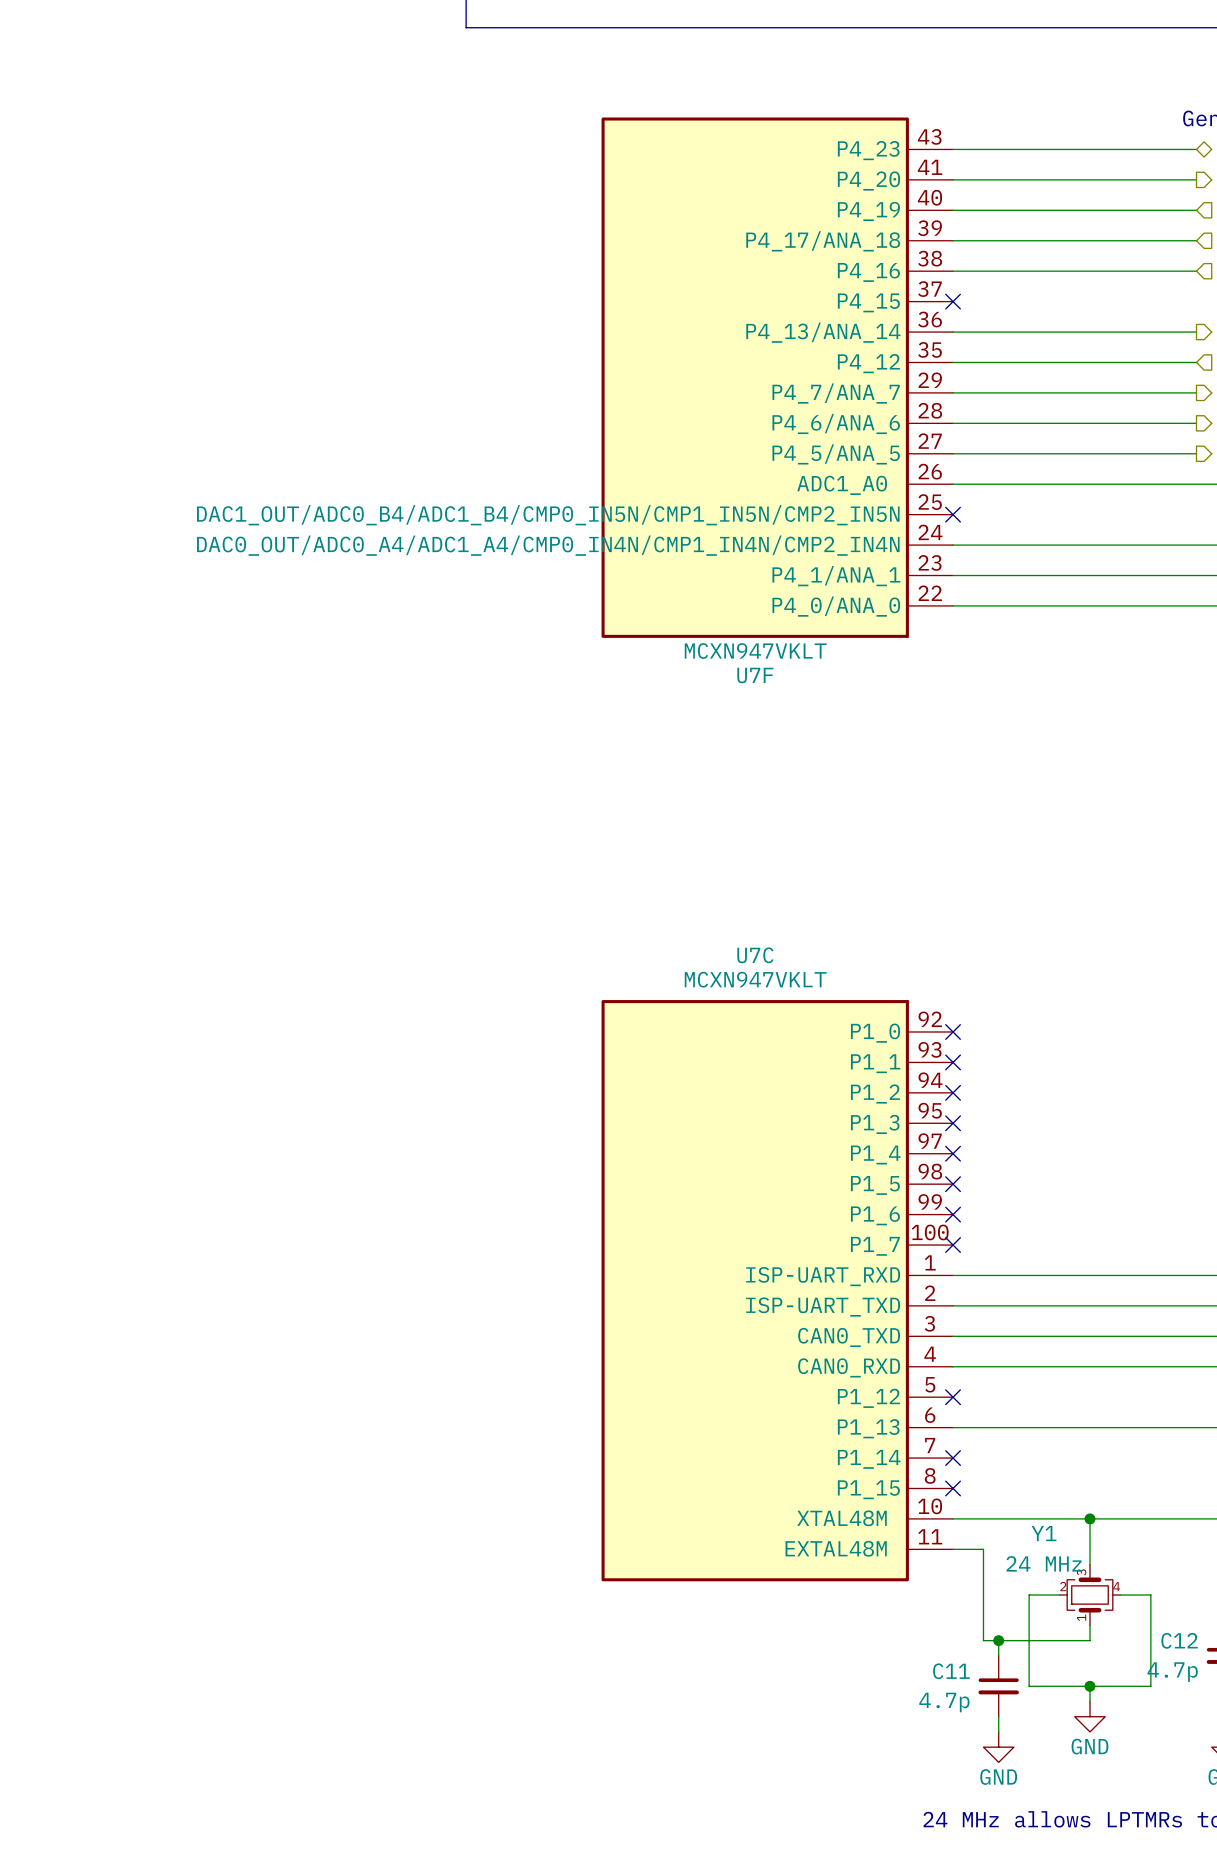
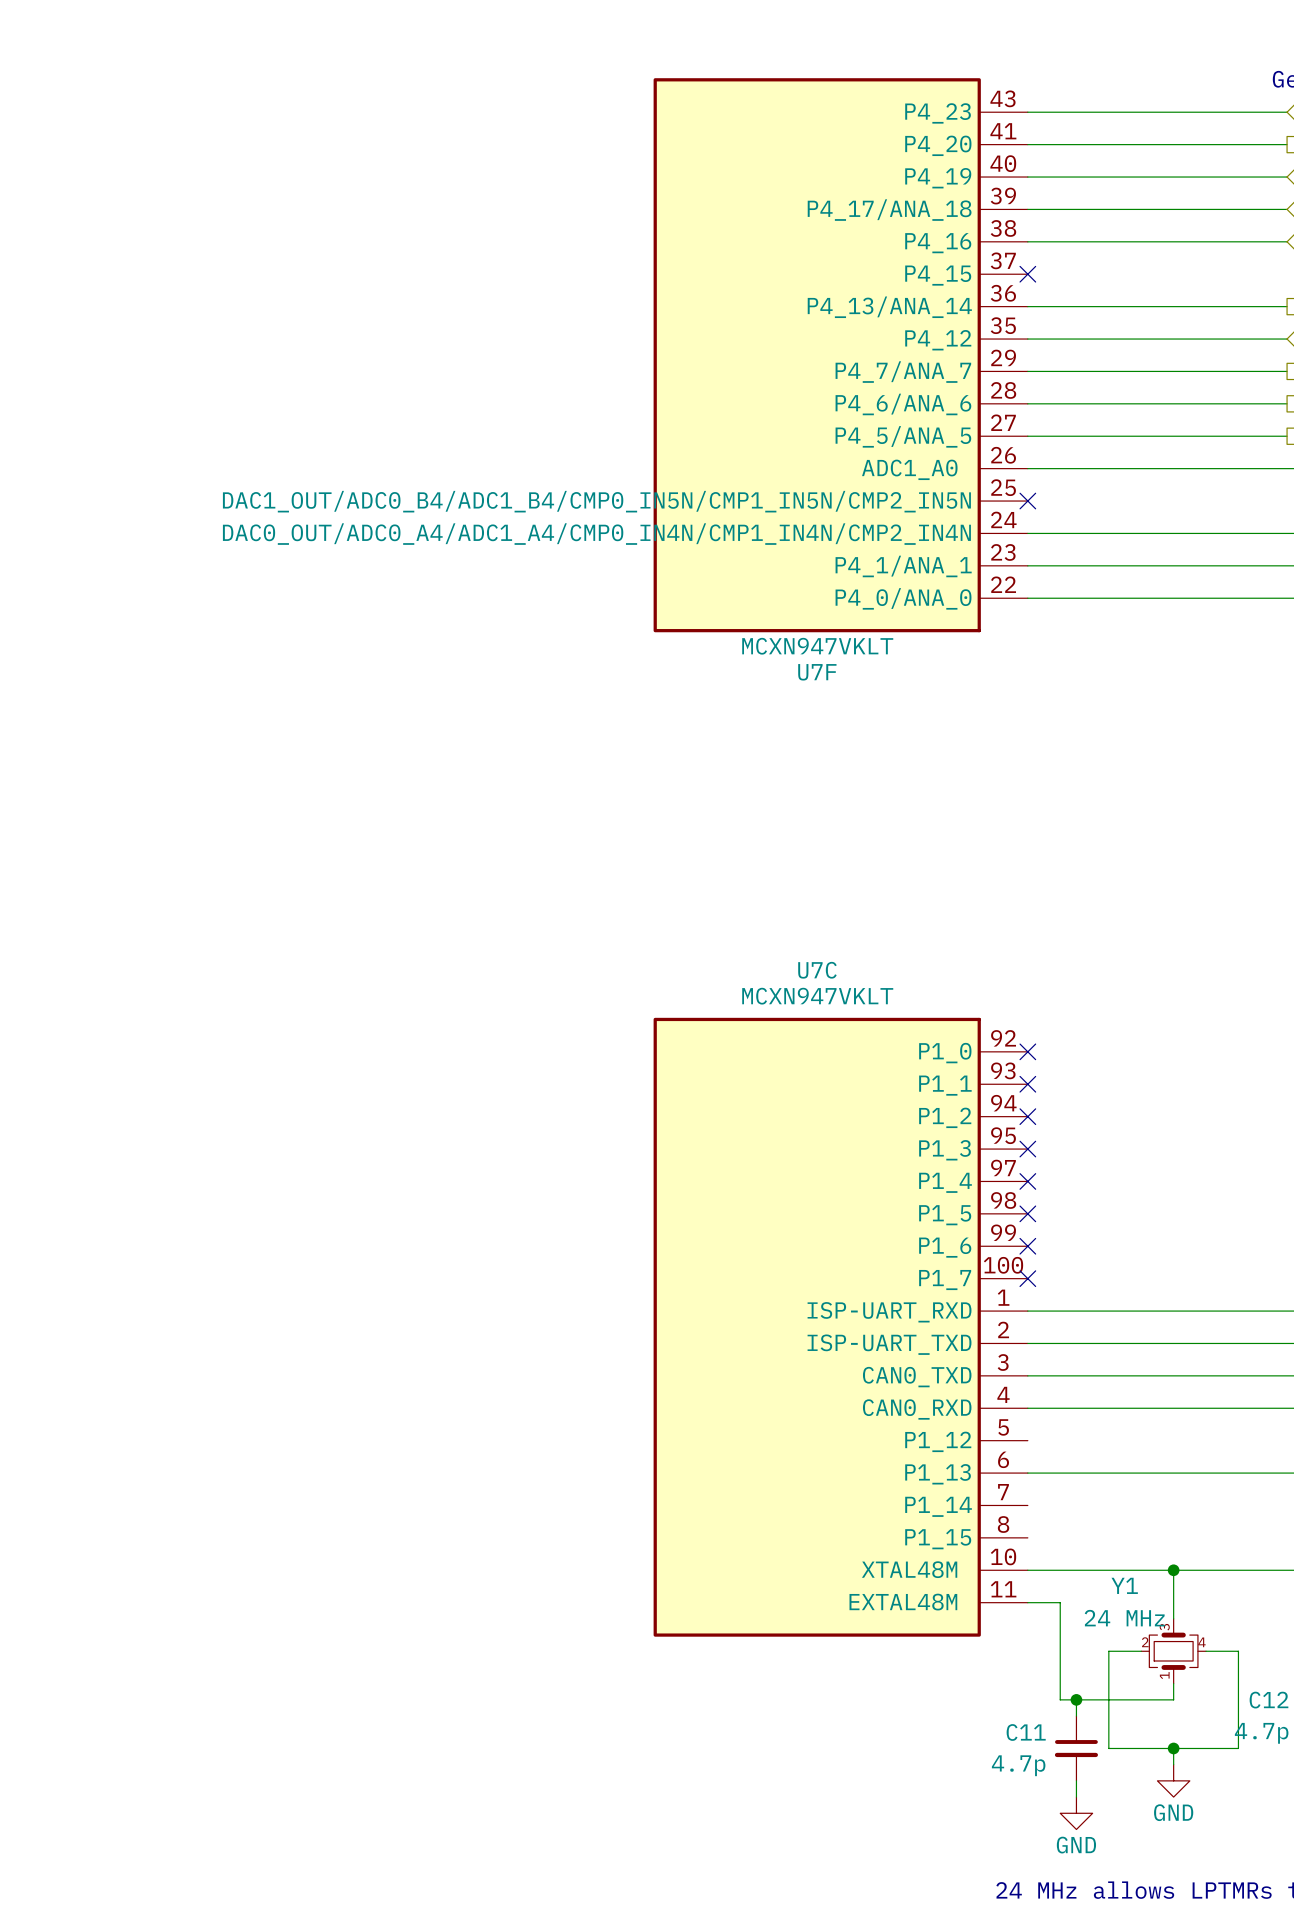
no-connect mark: (953, 1397) -> none
no-connect mark: (953, 1458) -> none
no-connect mark: (953, 1488) -> none

